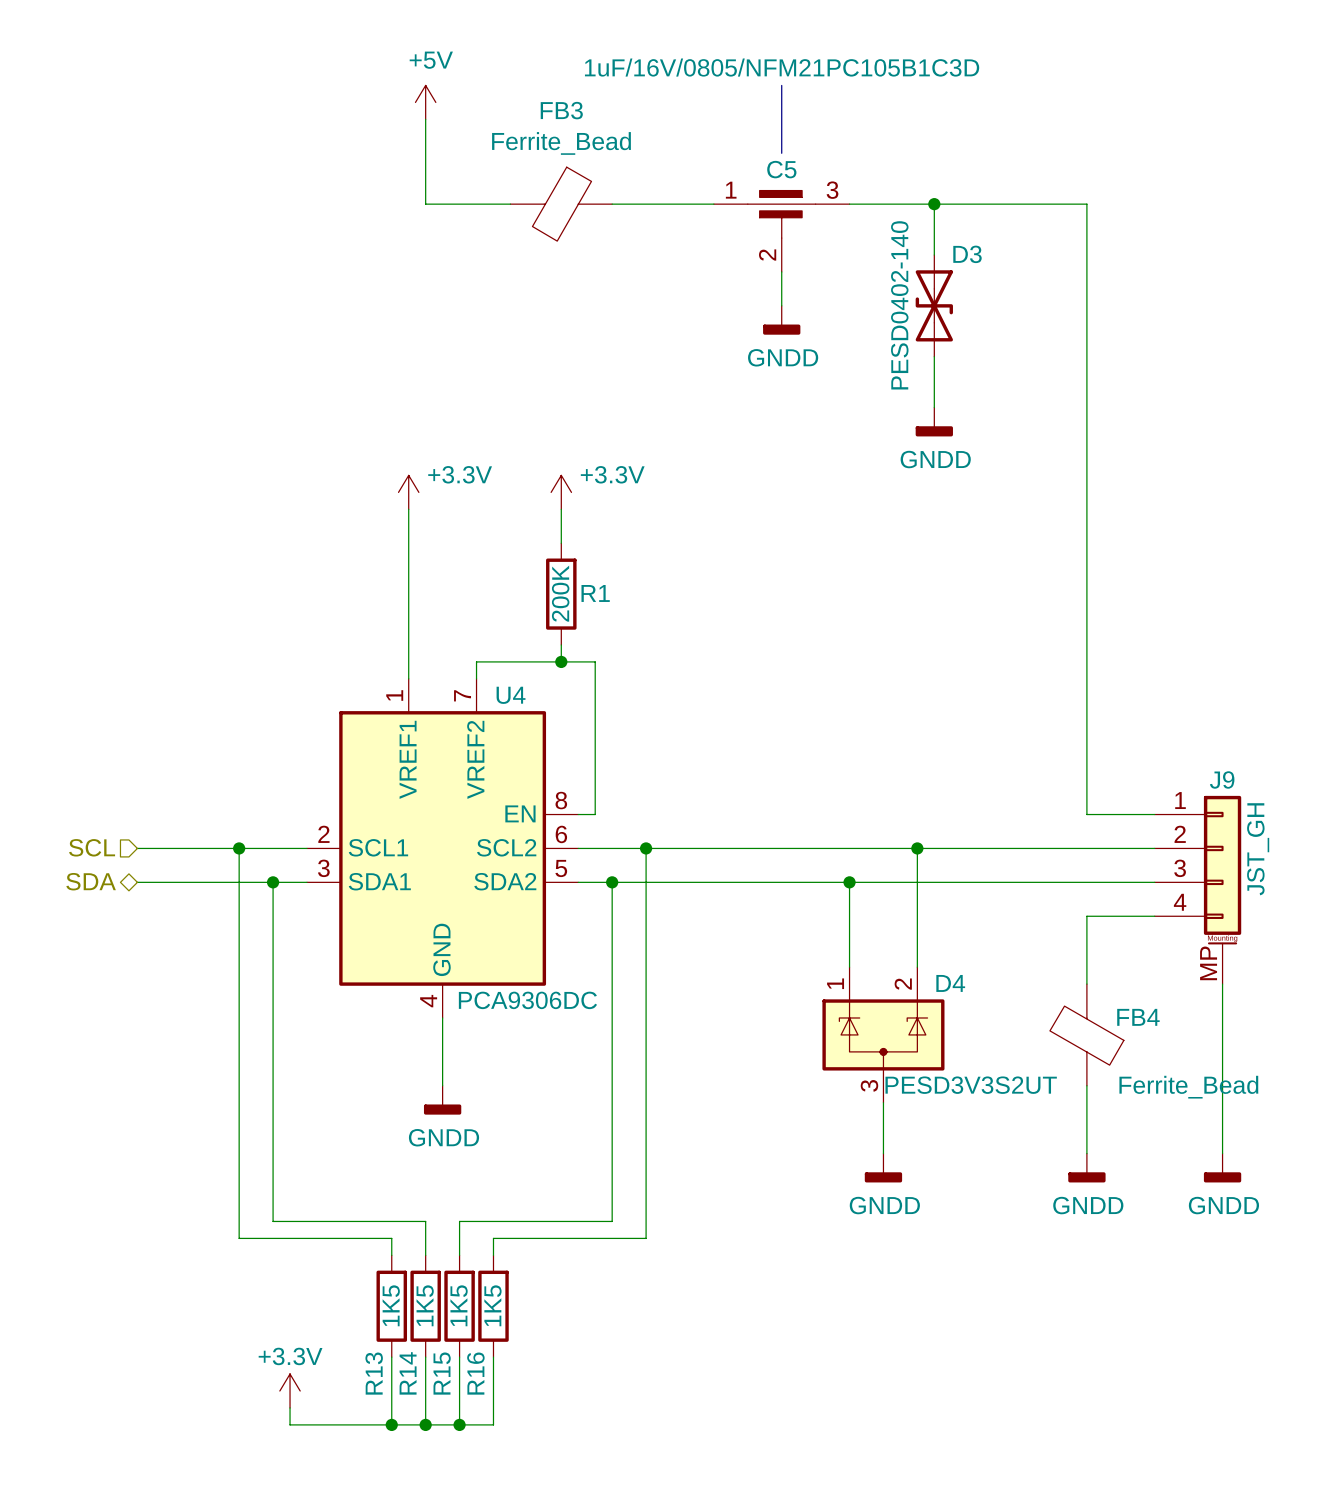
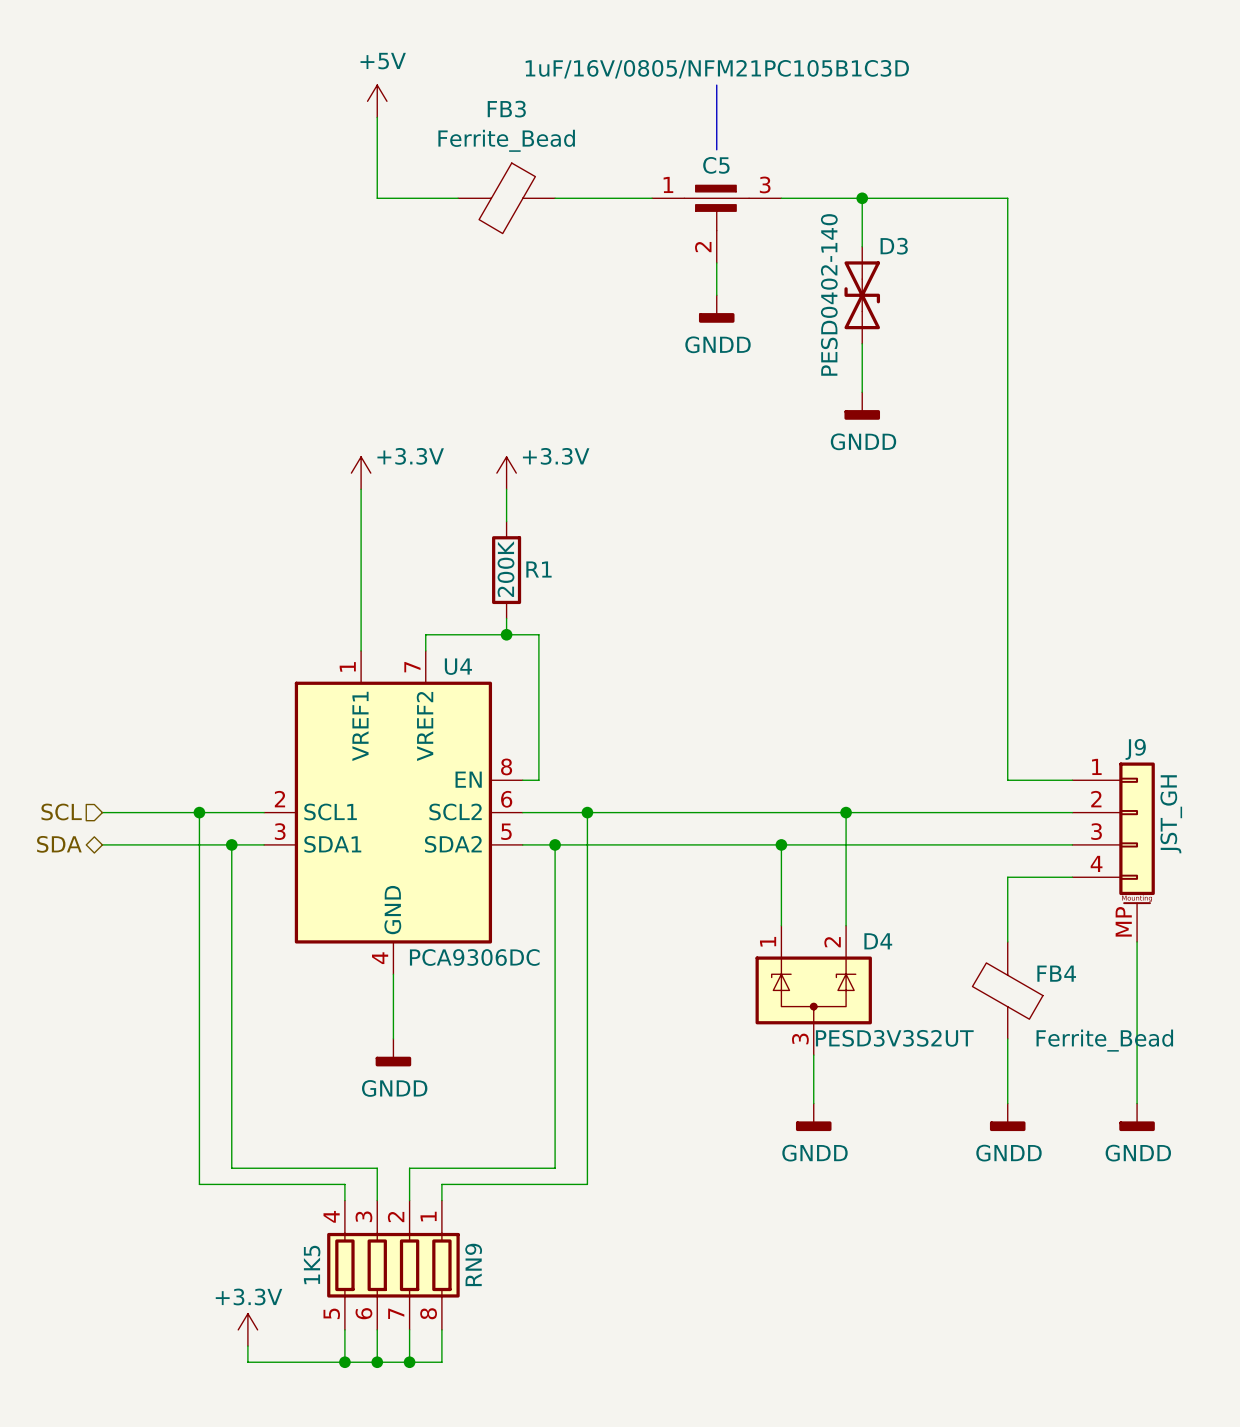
R13: 1K5 (391, 1306) -> none
R14: 1K5 (425, 1306) -> none
R15: 1K5 (459, 1306) -> none
R16: 1K5 (493, 1306) -> none
RN9: none -> 1K5 (393, 1265)

